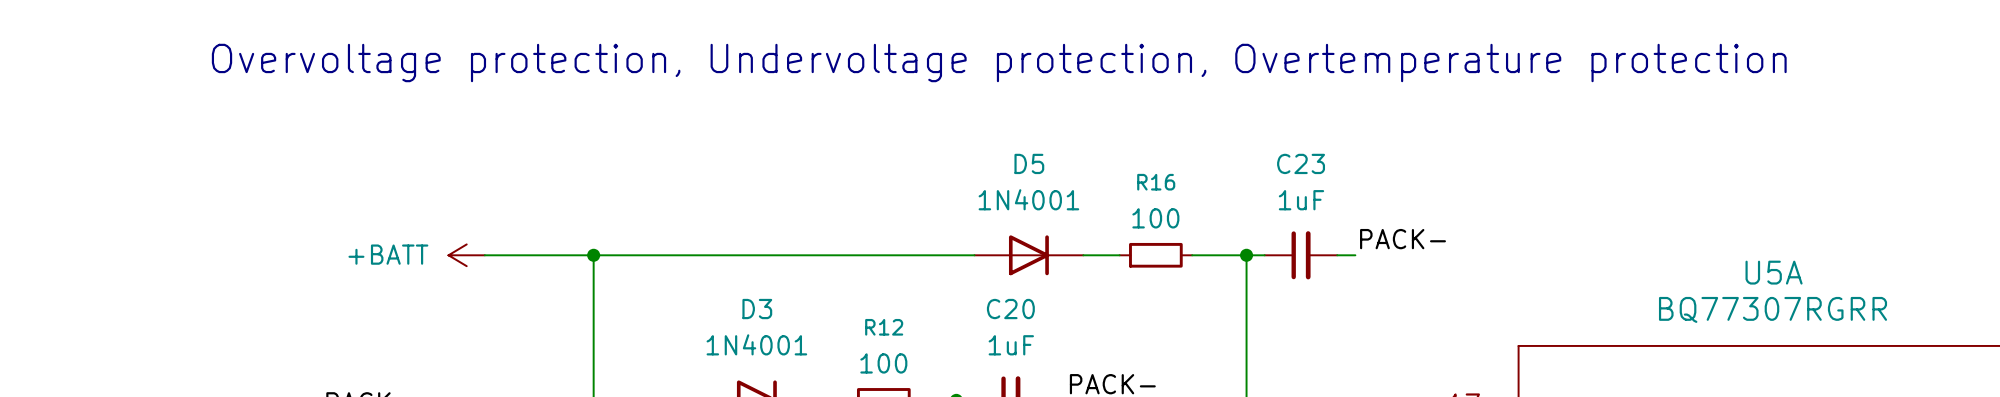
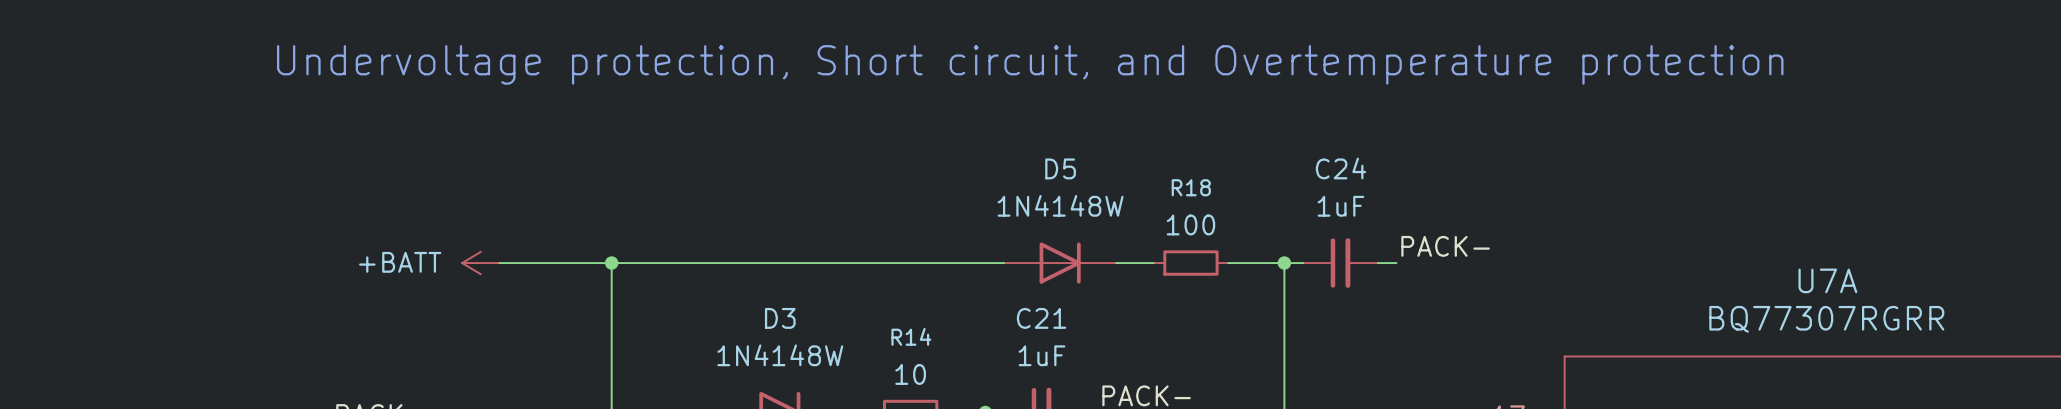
text: Overvoltage protection, Undervoltage protection, Overtemperature protection (999, 63) -> Undervoltage protection, Short circuit, and Overtemperature protection (1030, 64)
C23 name: C23 (1301, 163) -> C24 (1340, 168)
R16 name: R16 (1156, 182) -> R18 (1191, 187)
D5 value: 1N4001 (1028, 199) -> 1N4148W (1060, 205)
U5A name: U5A (1774, 272) -> U7A (1827, 280)
C20 name: C20 (1010, 309) -> C21 (1041, 318)
R12 name: R12 (884, 327) -> R14 (911, 336)
D3 value: 1N4001 (756, 344) -> 1N4148W (780, 355)
R12 value: 100 (883, 363) -> 10 (910, 374)

